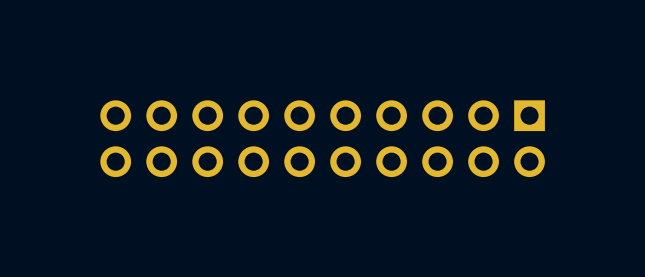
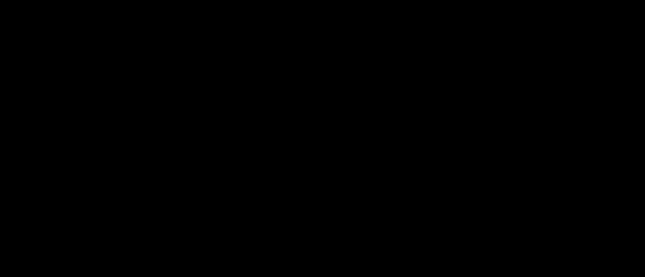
part: (322, 138) -> none

